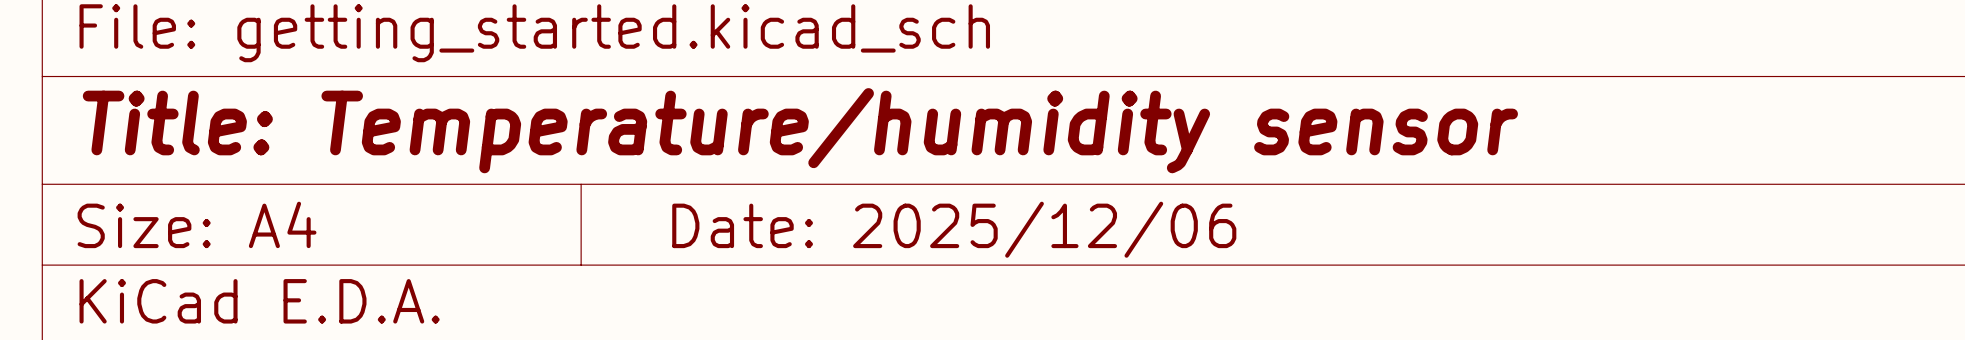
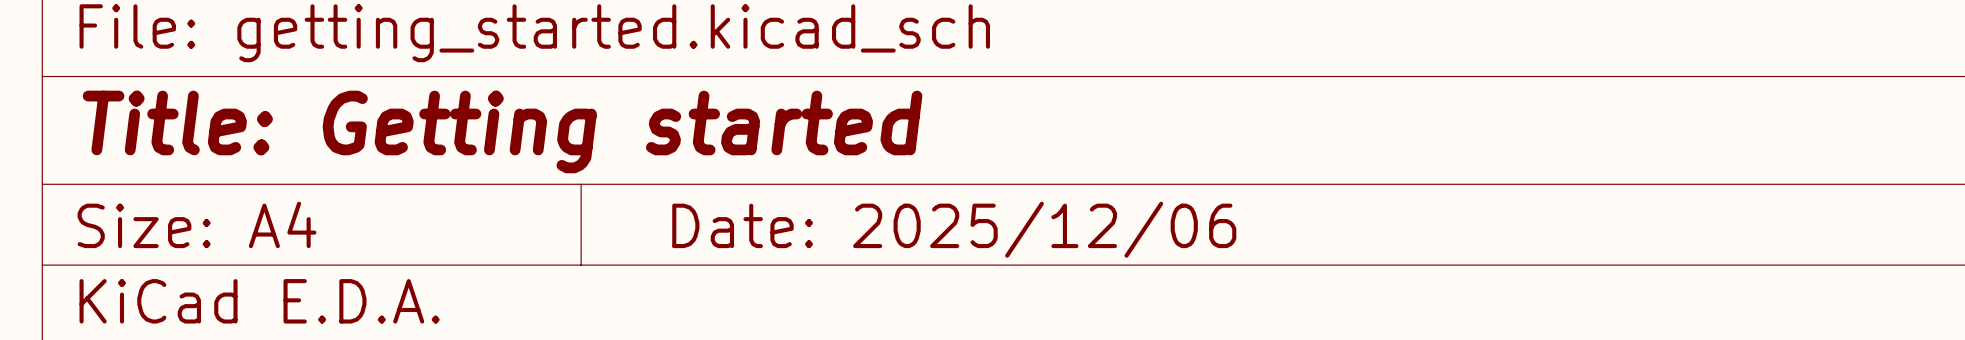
title block: Title: Temperature/humidity sensor (800, 130) -> Title: Getting started (502, 131)

